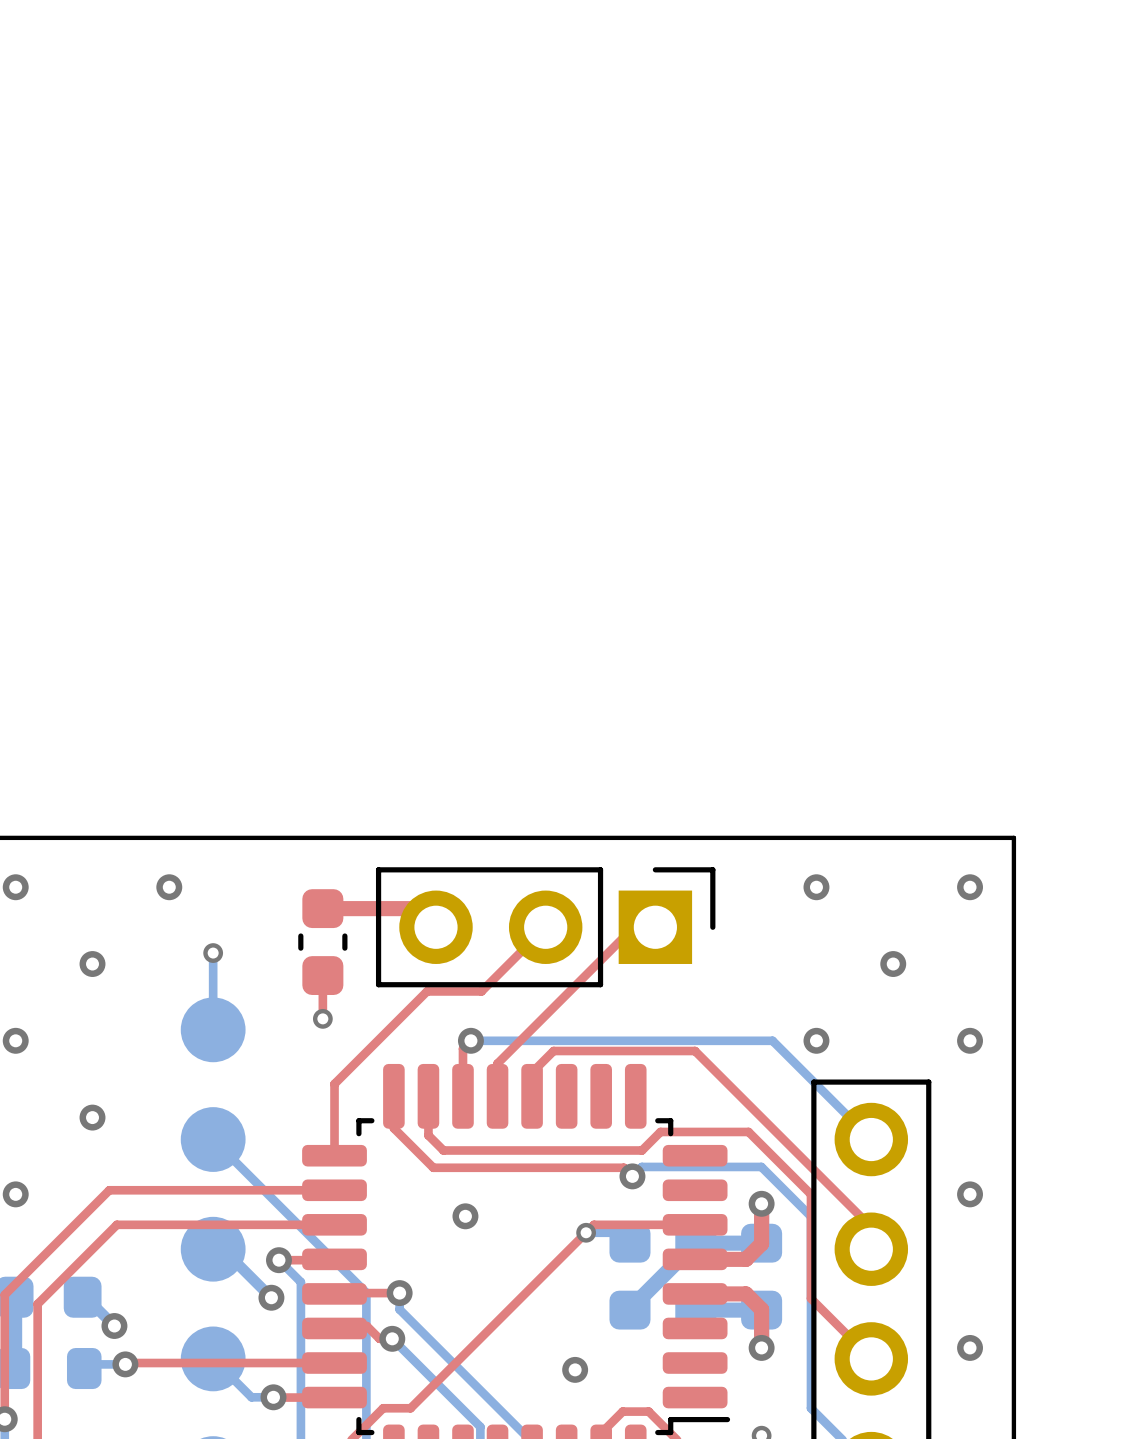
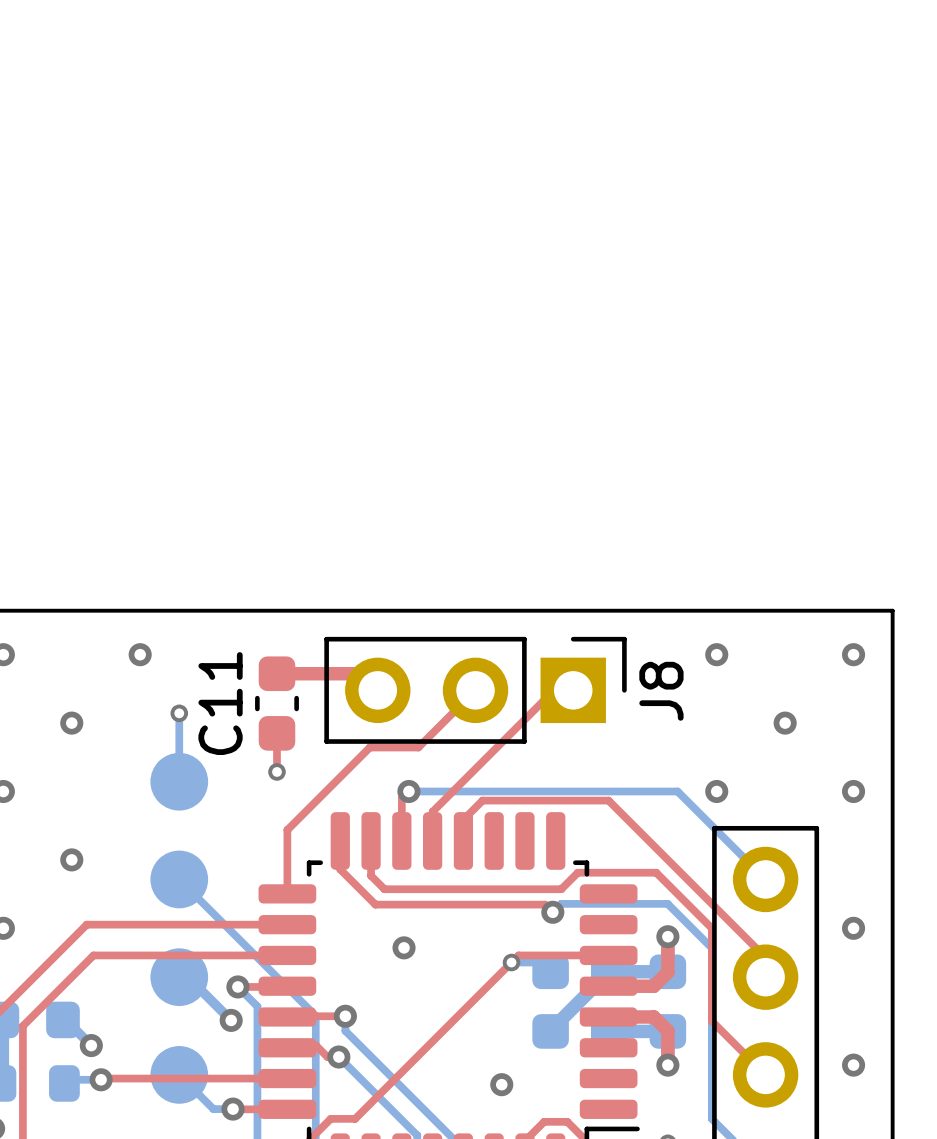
J8 name: none -> J8 (661, 691)
C11 name: none -> C11 (220, 703)

